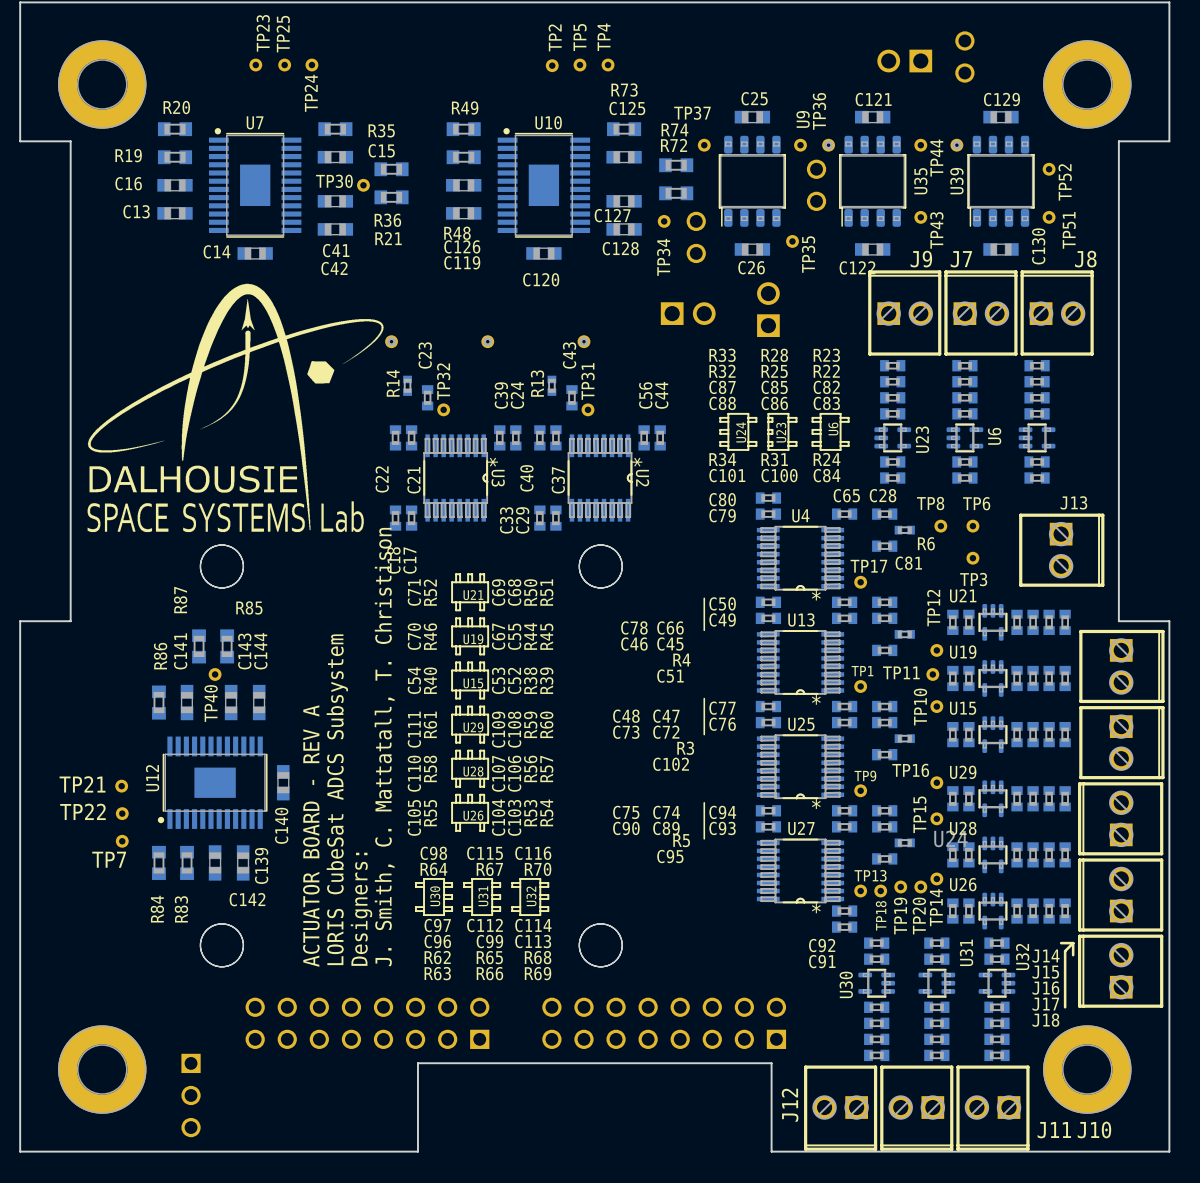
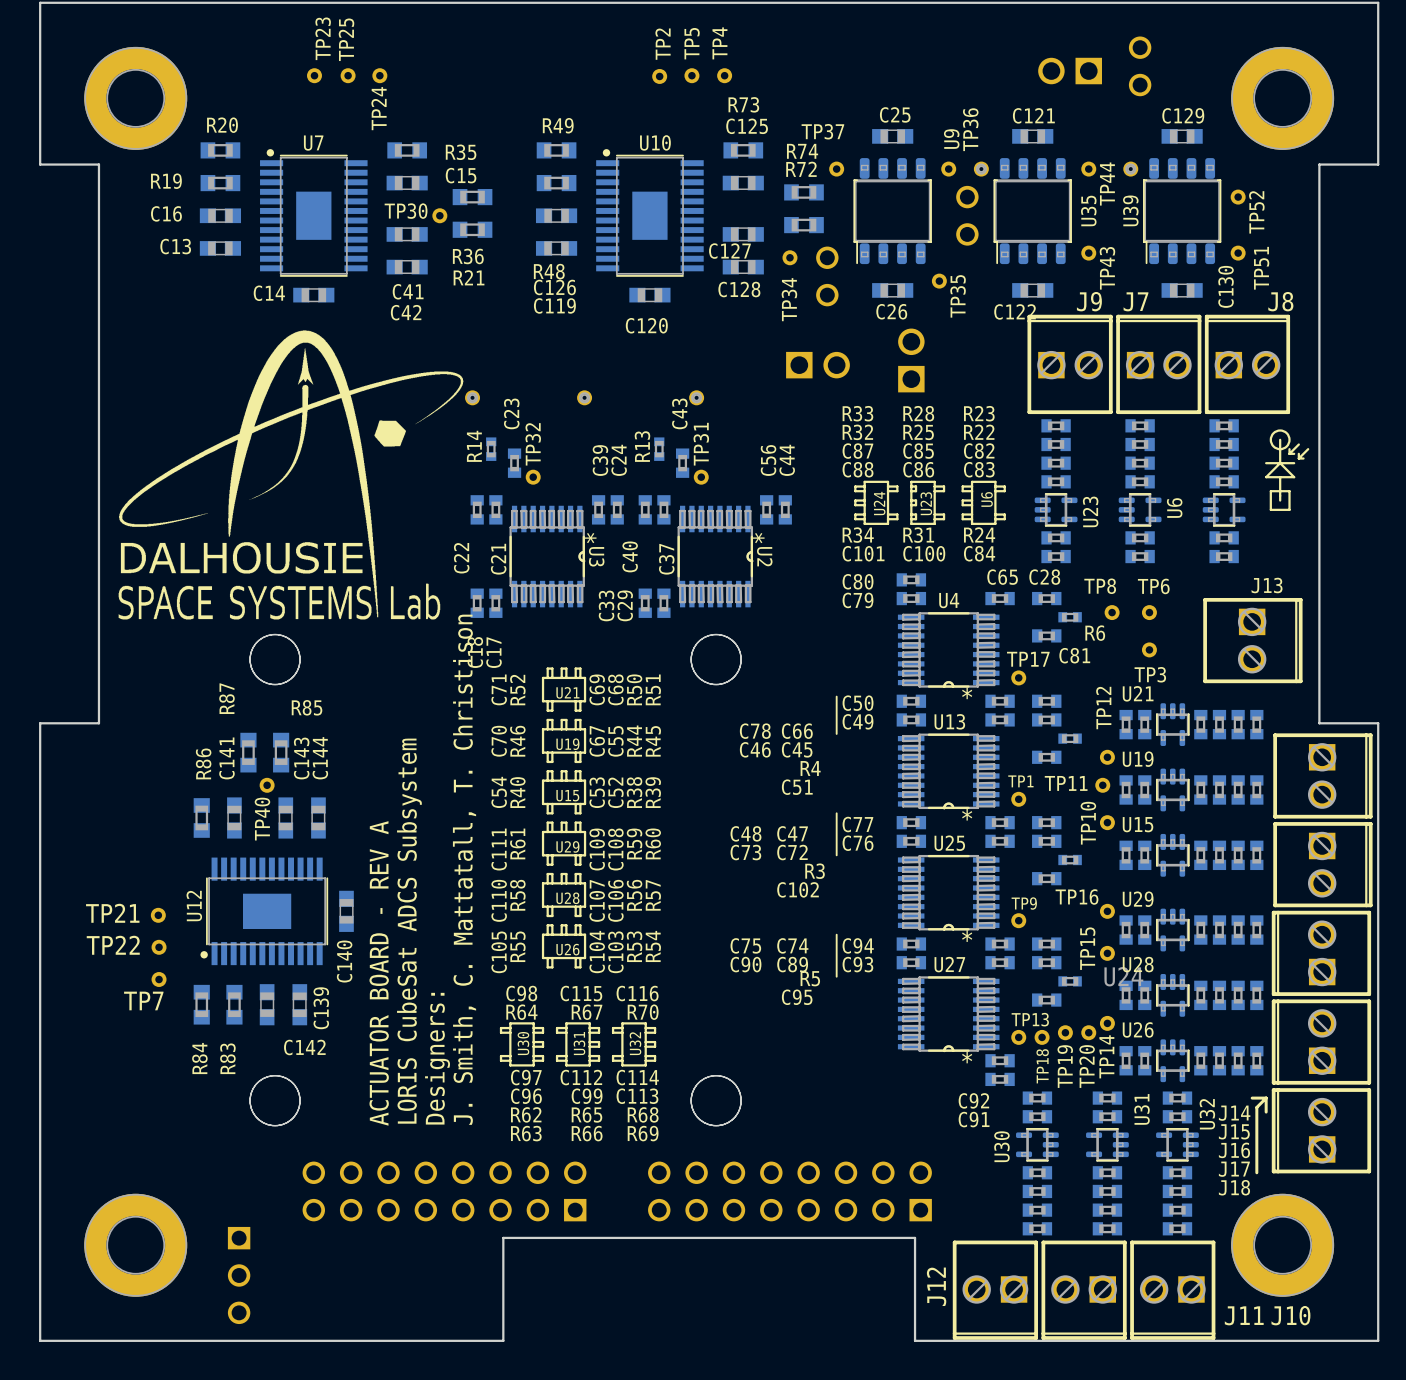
drawing: none -> [1269, 429, 1291, 451]
line: none -> (1280, 439) (1280, 463)
line: none -> (1298, 444) (1289, 453)
line: none -> (1289, 449) (1289, 453)
line: none -> (1308, 449) (1298, 458)
line: none -> (1294, 453) (1289, 453)
line: none -> (1298, 453) (1298, 458)
line: none -> (1303, 458) (1298, 458)
line: none -> (1280, 463) (1294, 477) (1266, 477) (1280, 463)
line: none -> (1294, 463) (1266, 463)
line: none -> (1280, 477) (1280, 500)
line: none -> (1289, 491) (1270, 491) (1270, 509) (1289, 509) (1289, 491)

